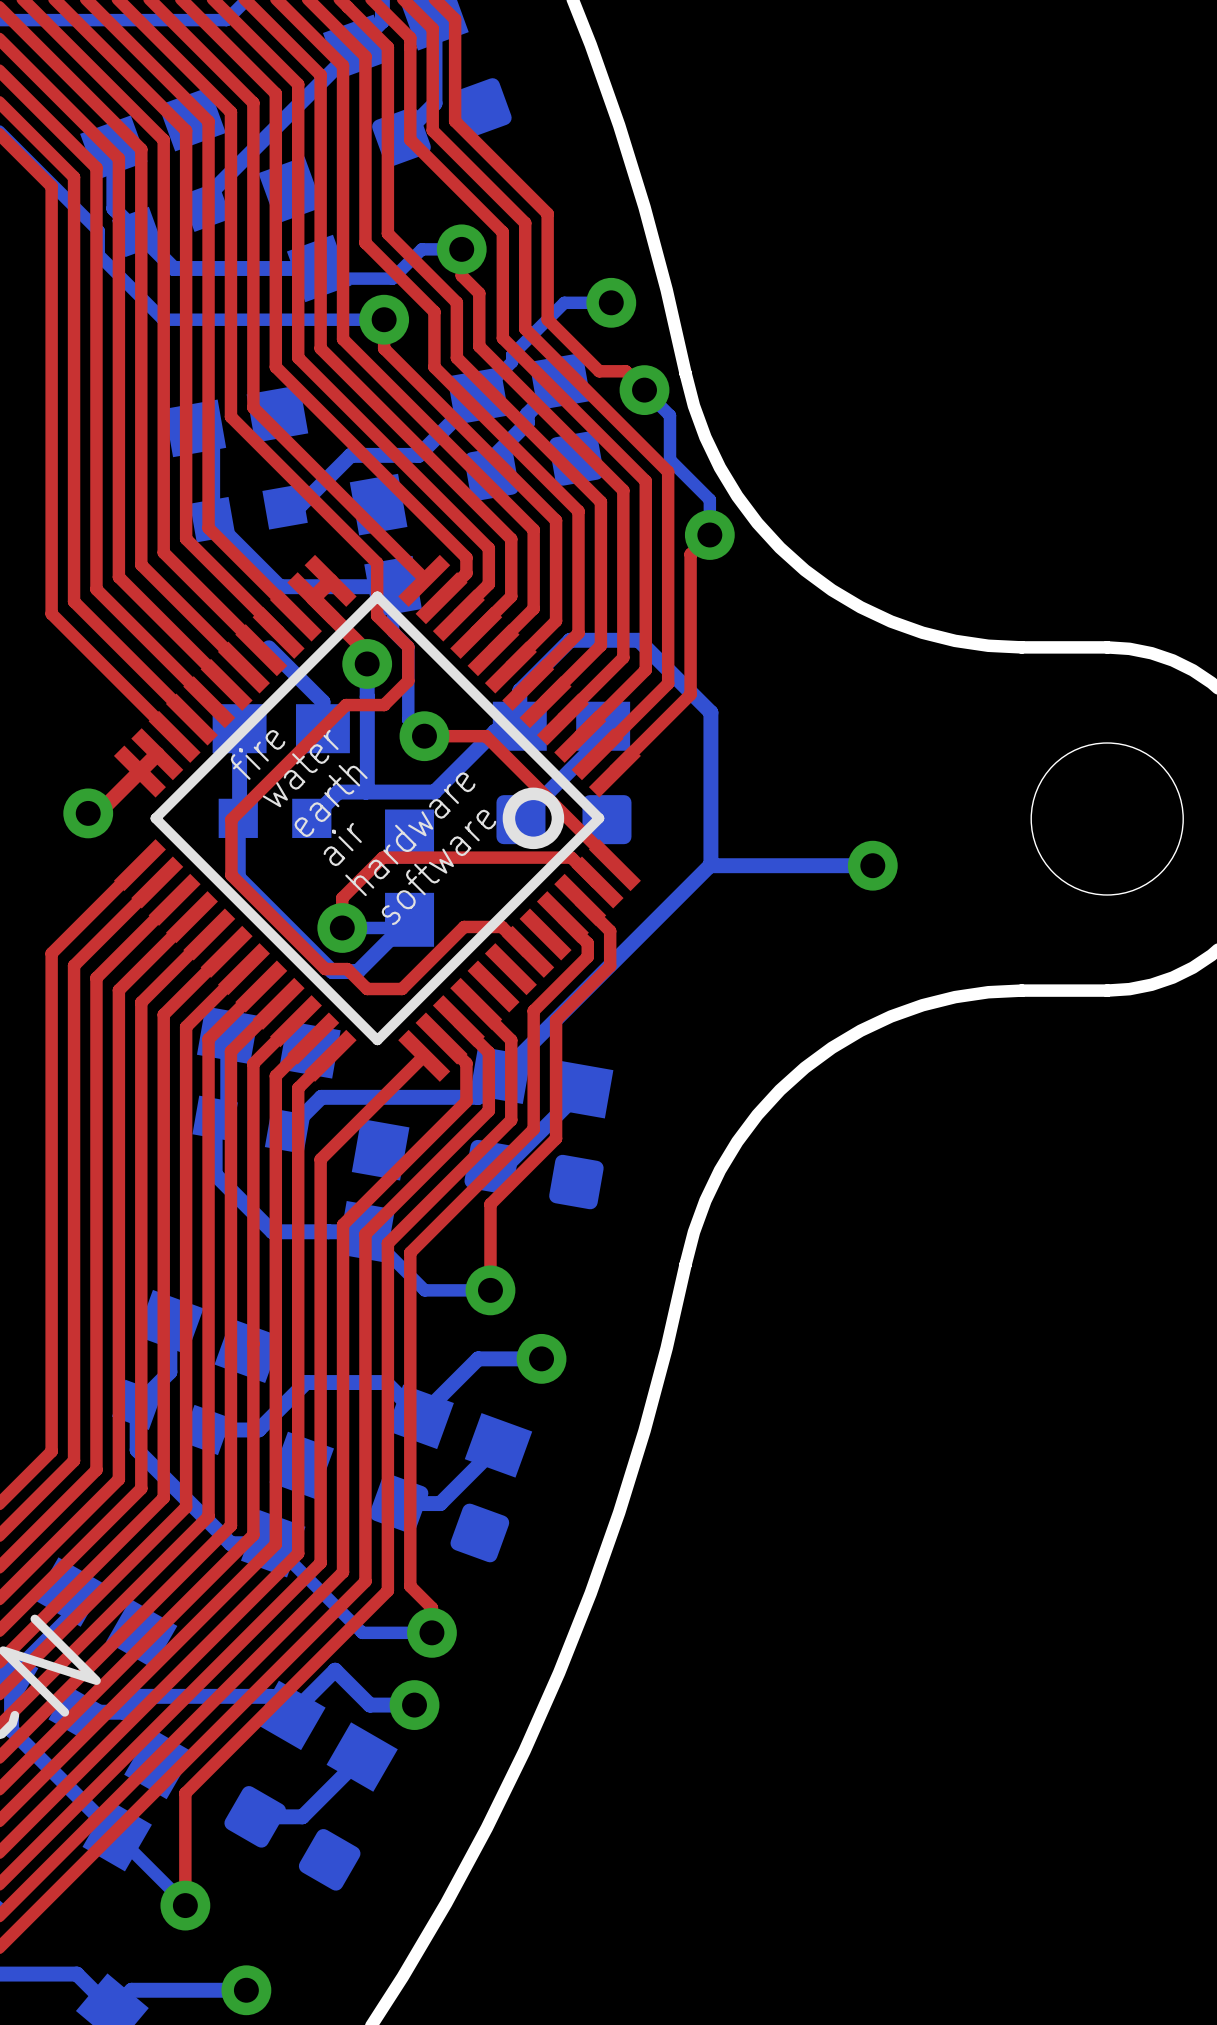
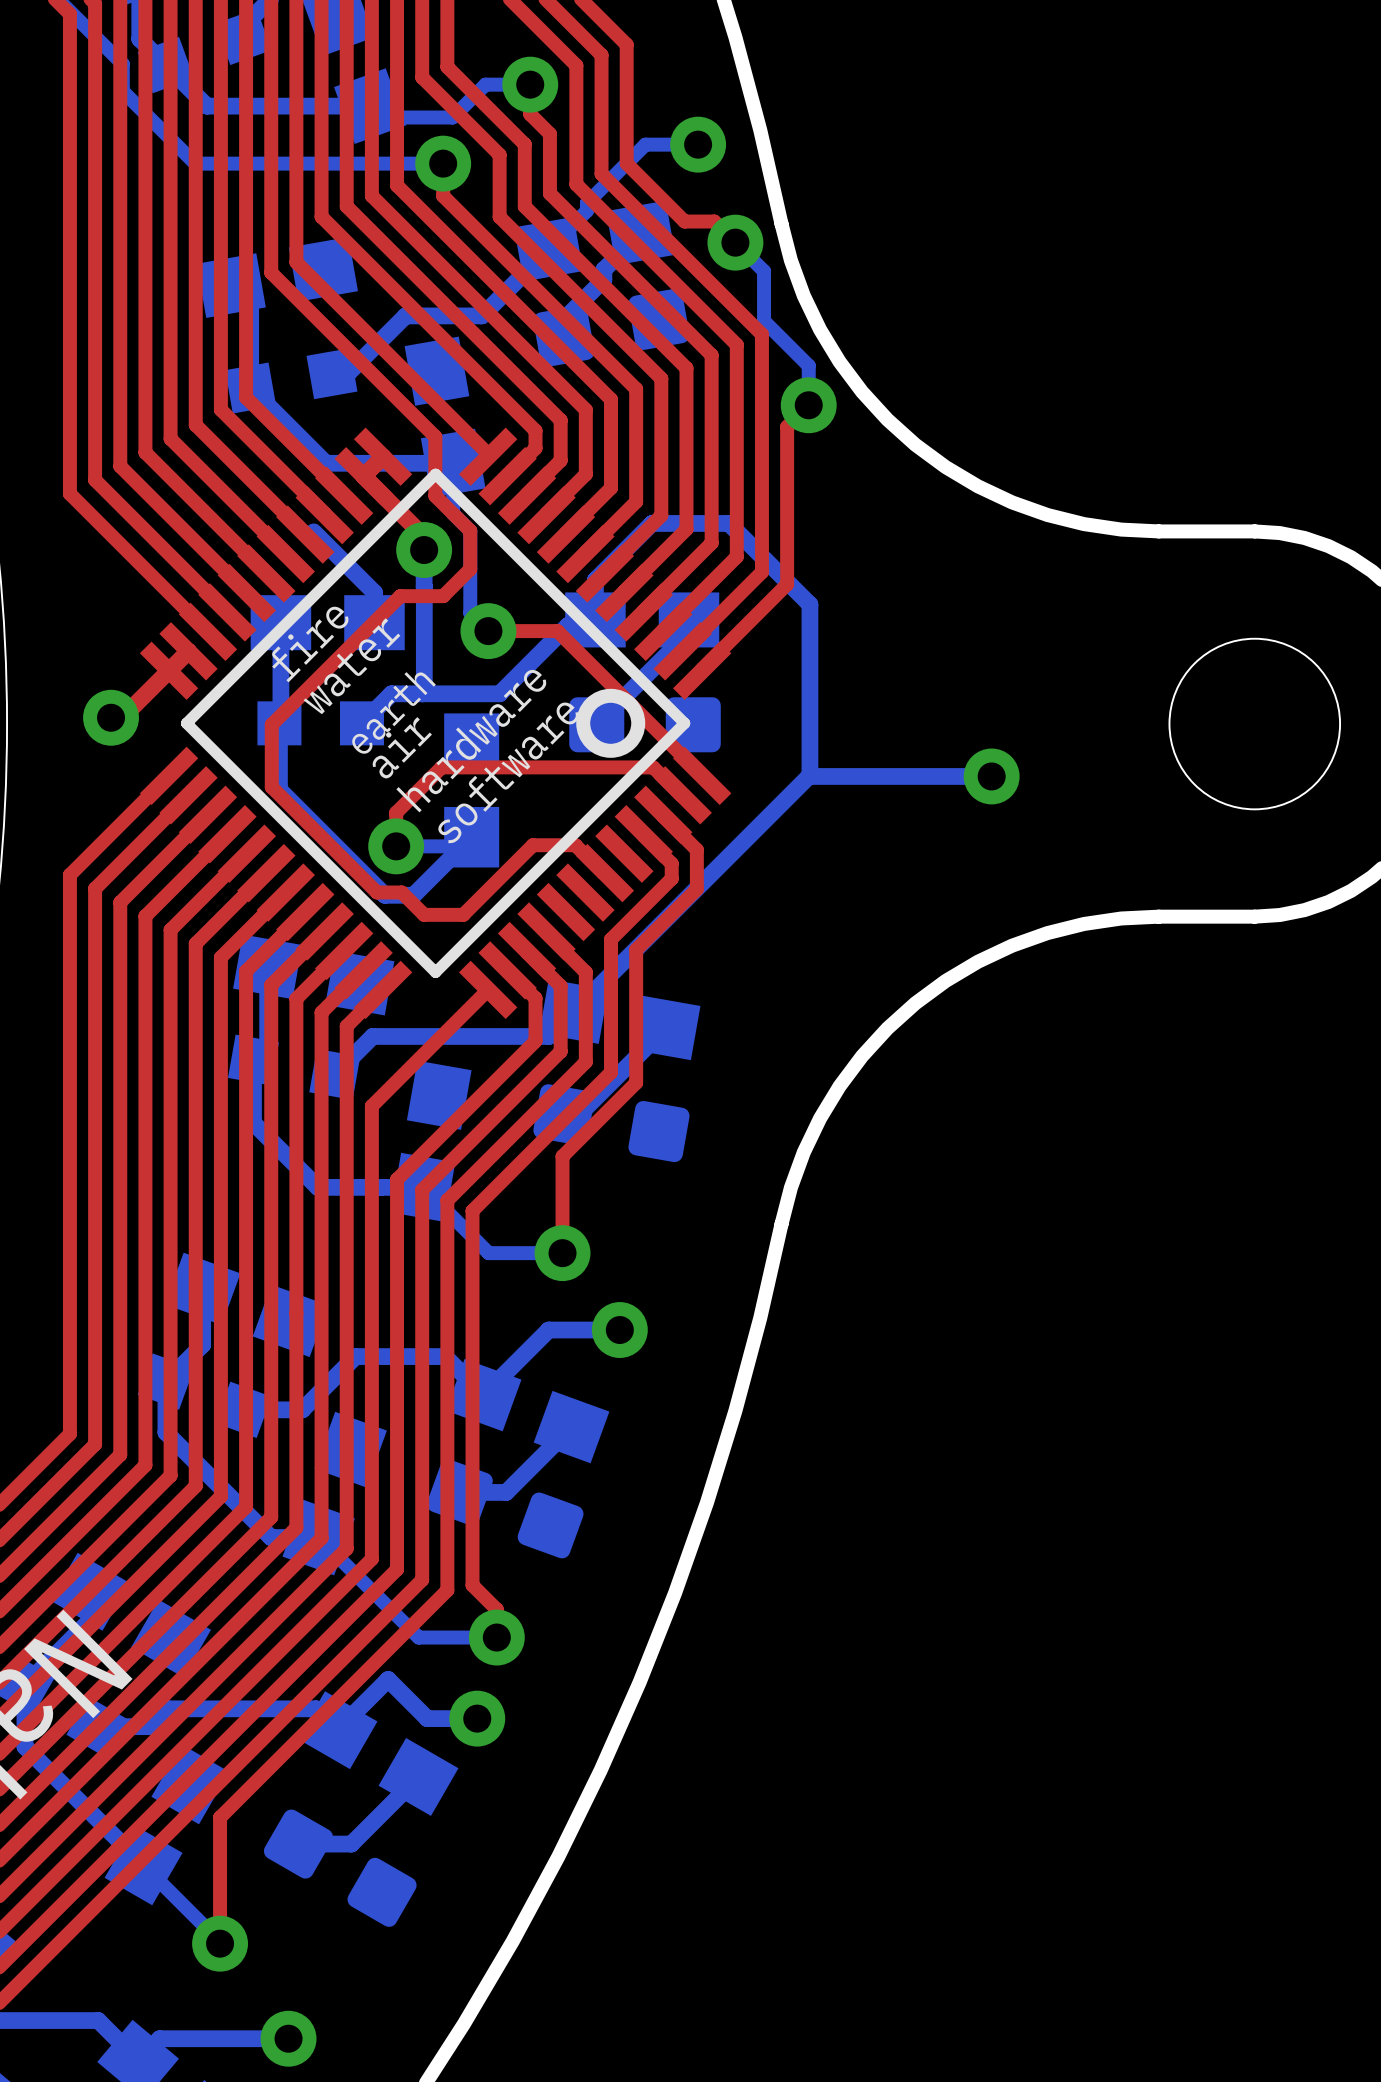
text position: earth (331, 800) -> earth (393, 713)

